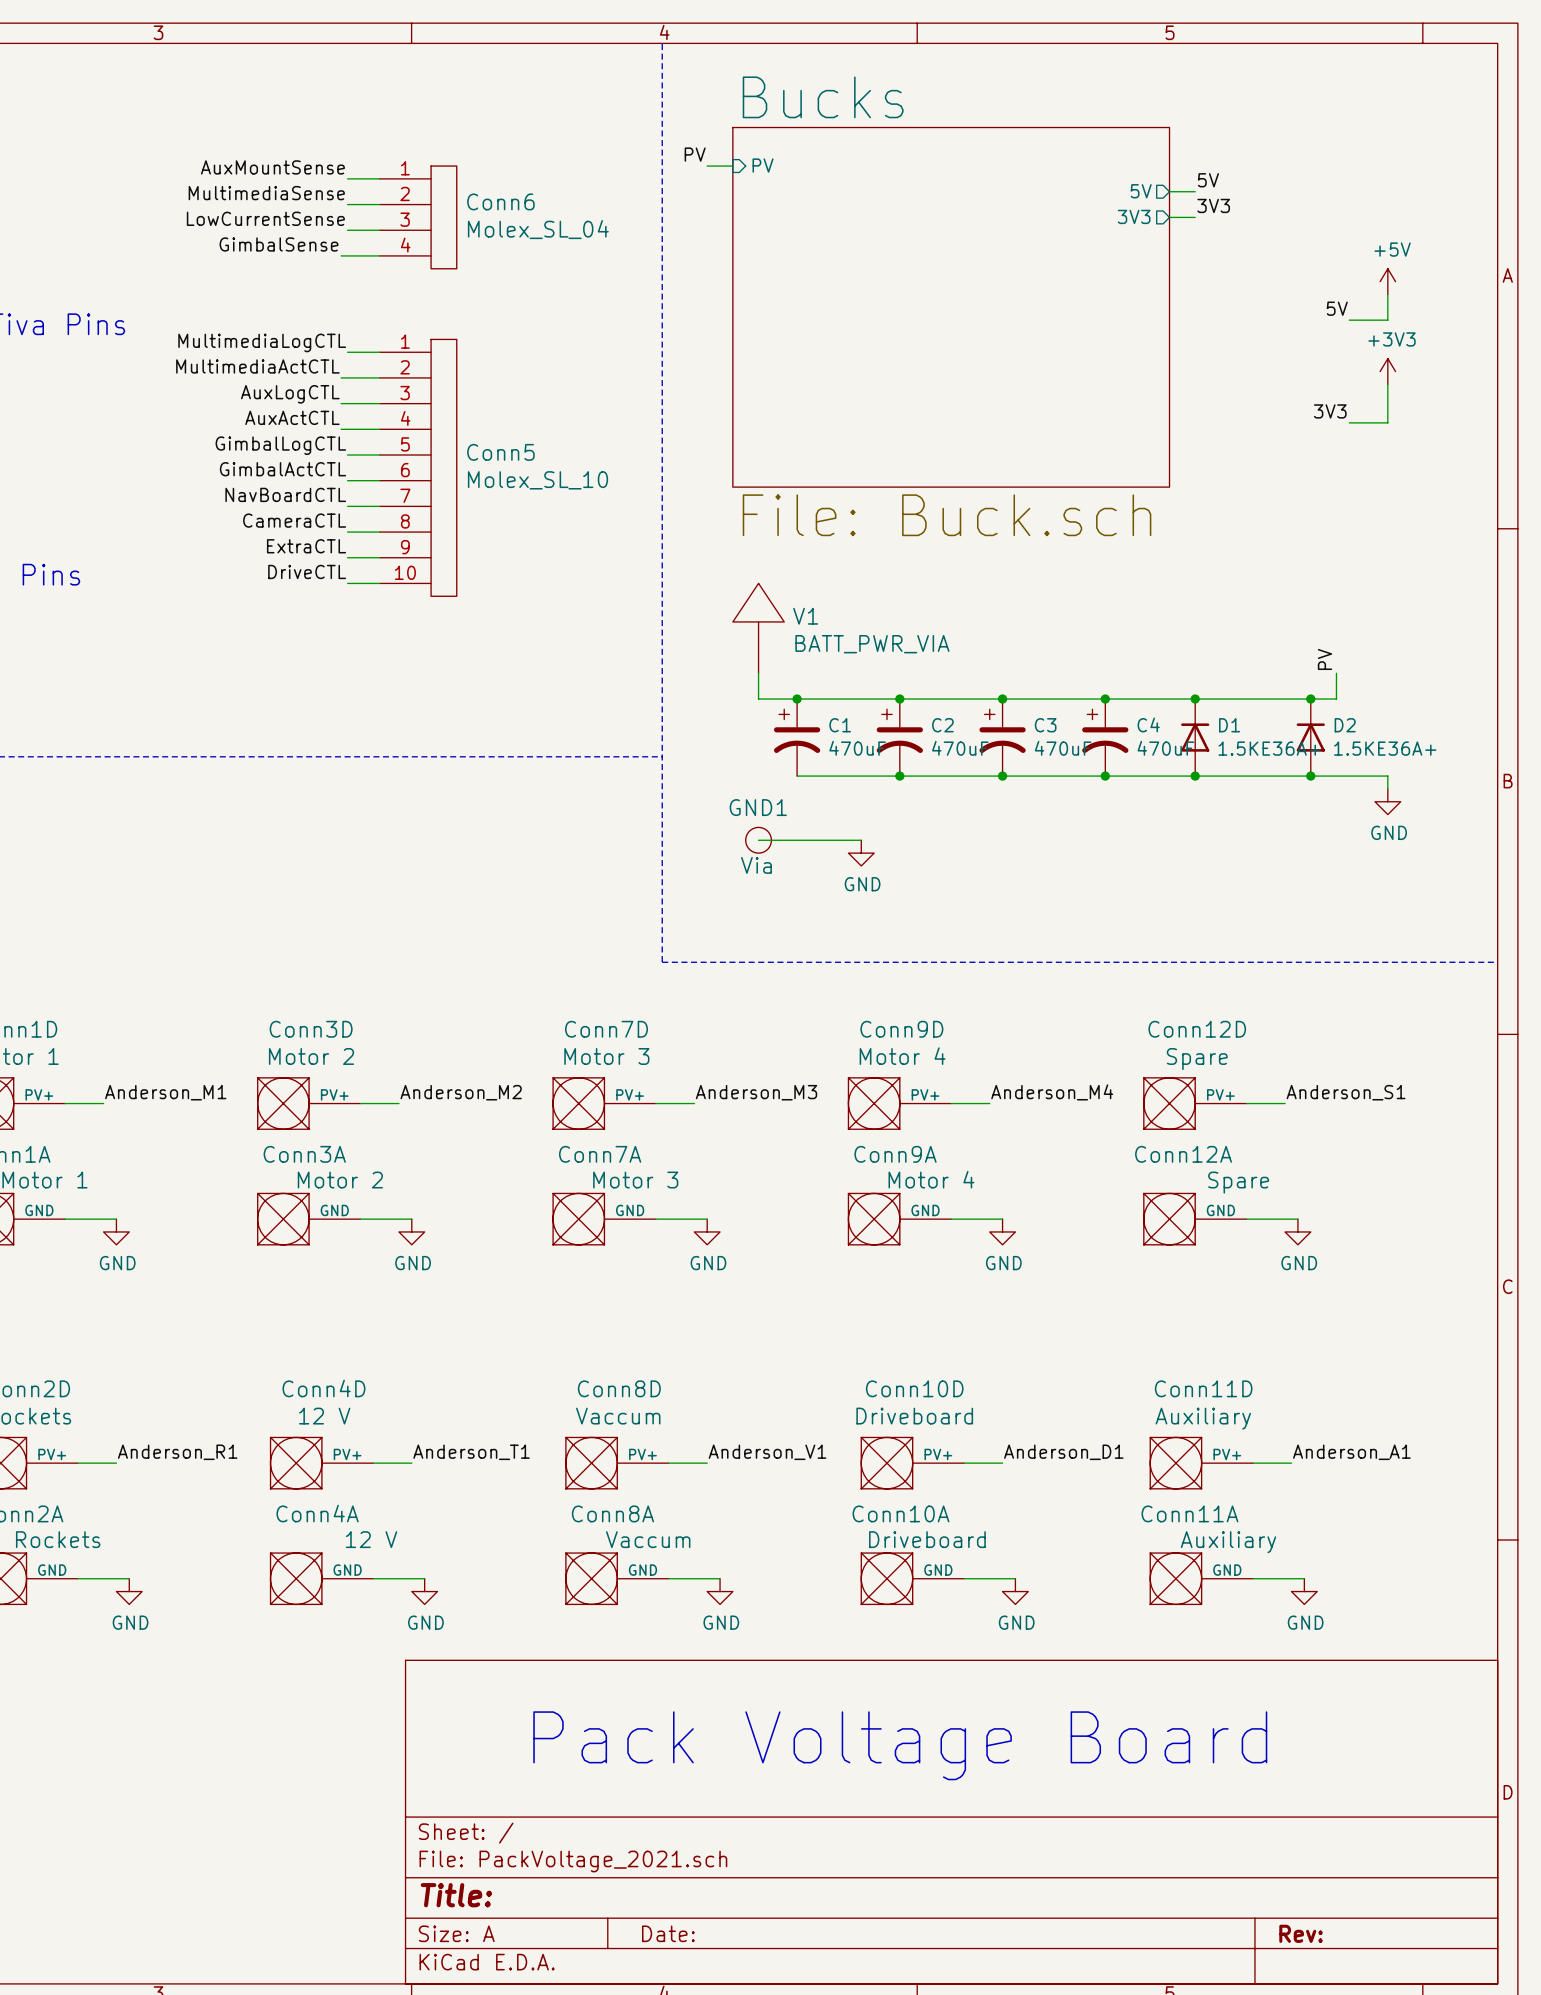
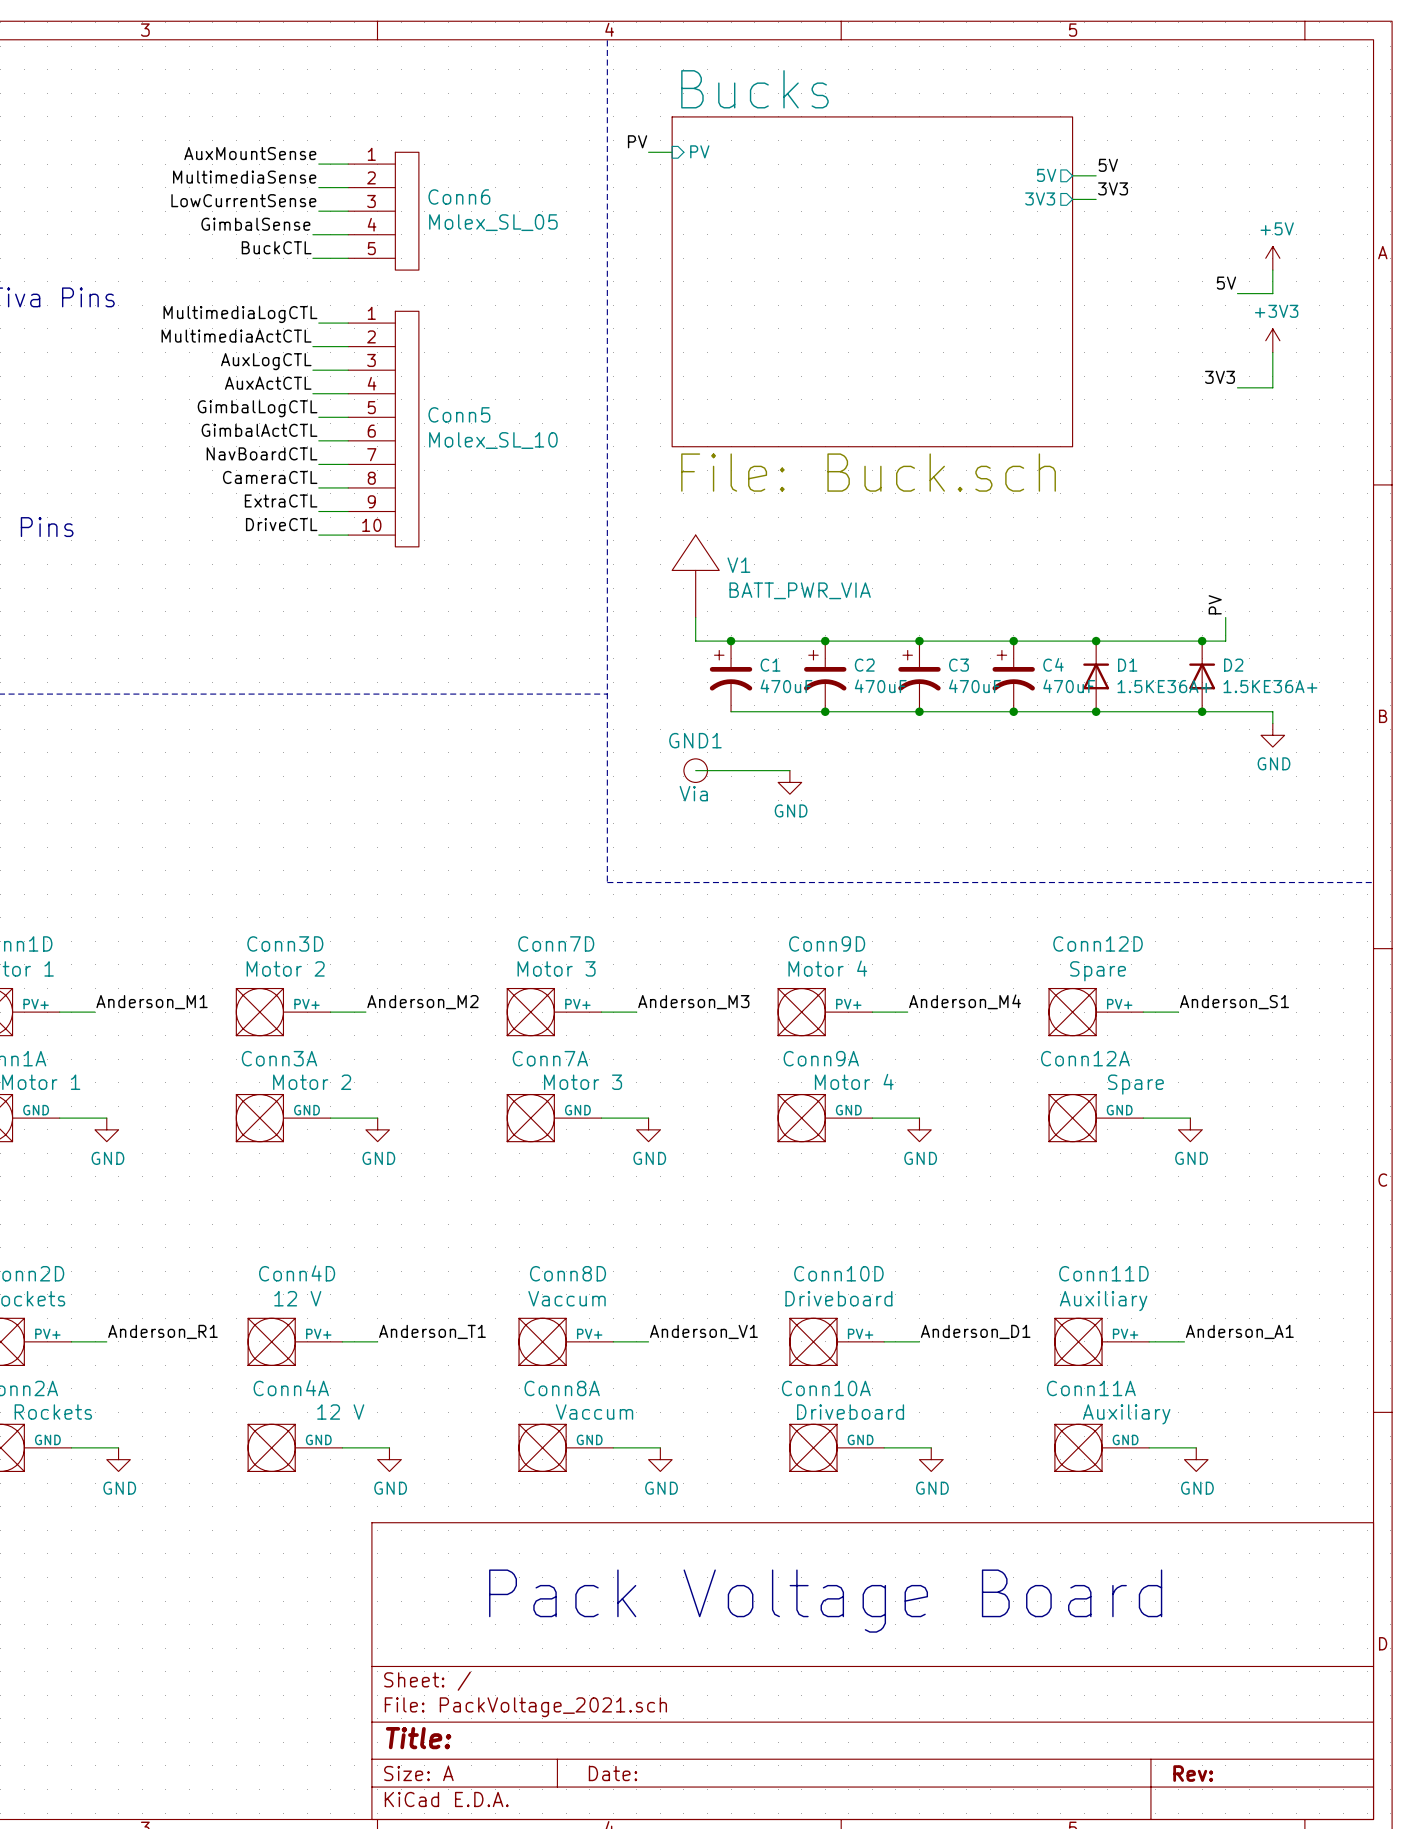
Conn6 symbol: [379, 166, 457, 269] -> [348, 152, 419, 271]
Conn6 value: Molex_SL_04 (538, 229) -> Molex_SL_05 (493, 222)
label: none -> BuckCTL (276, 247)
wire: none -> (312, 258) (348, 258)

